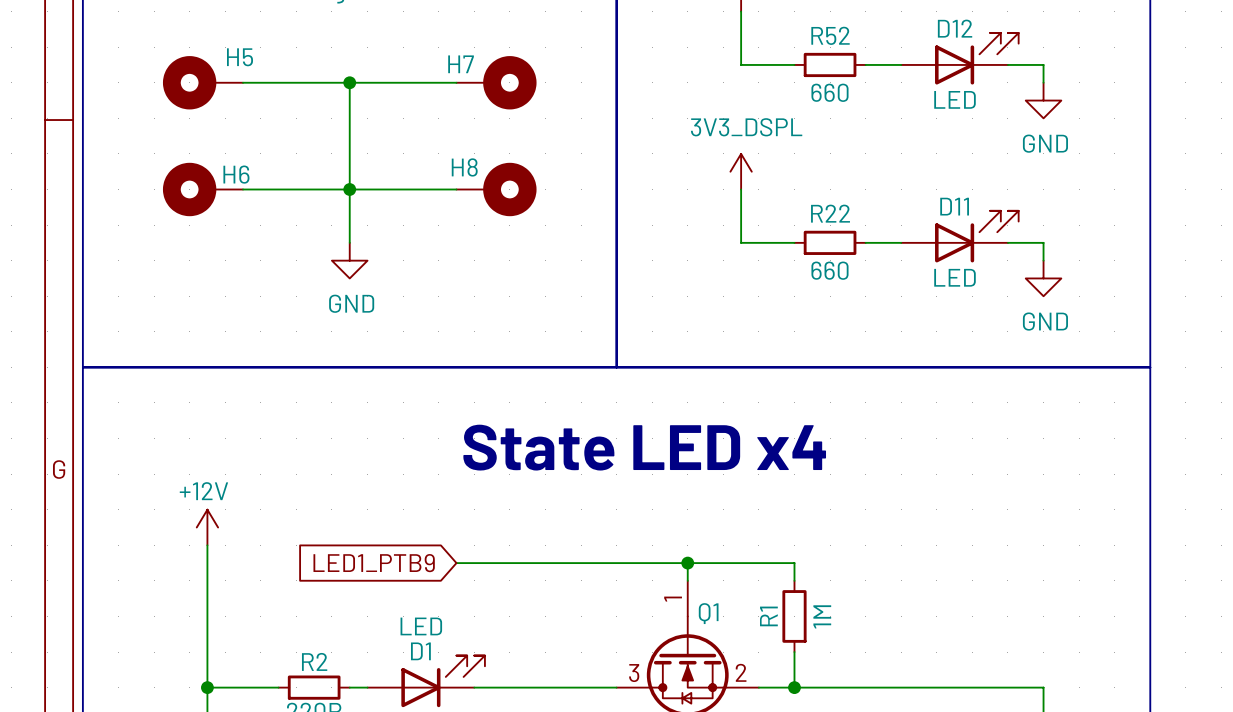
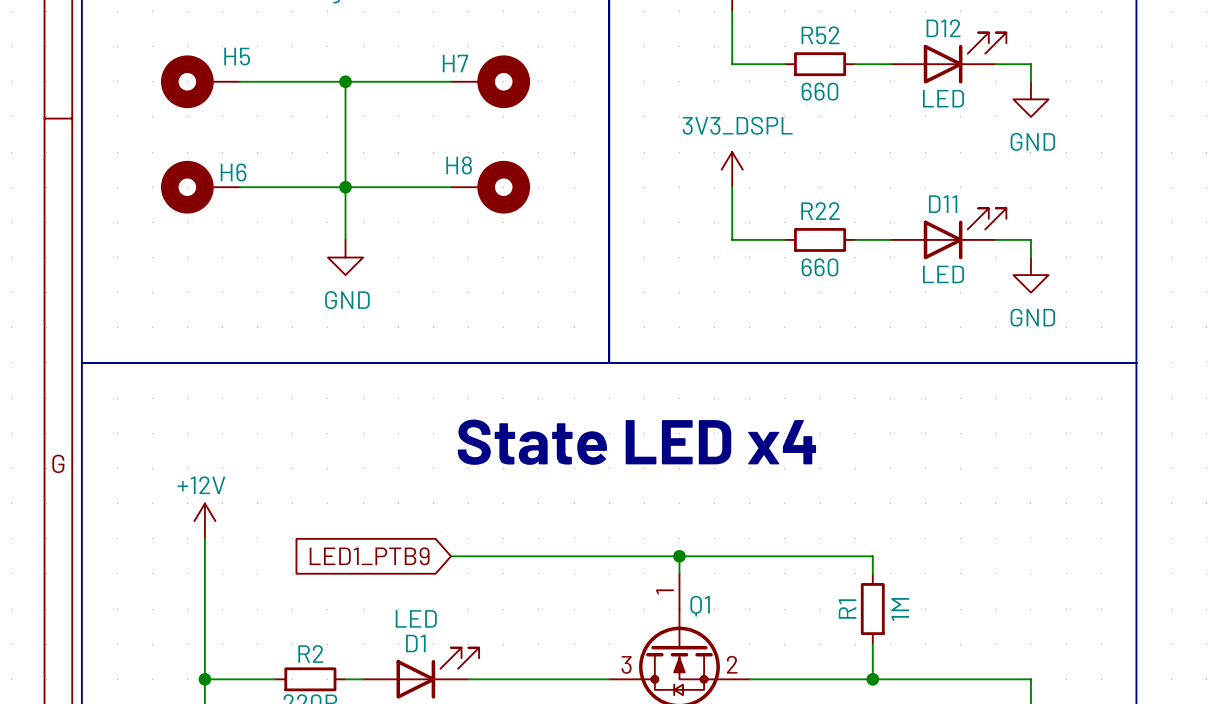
wire: (794, 563) (794, 580) -> (784, 556) (872, 556) (872, 573)
R1 position: (794, 616) -> (872, 609)
wire: (794, 652) (794, 687) -> (872, 644) (872, 679)
junction: (794, 687) -> none
junction: none -> (872, 679)

